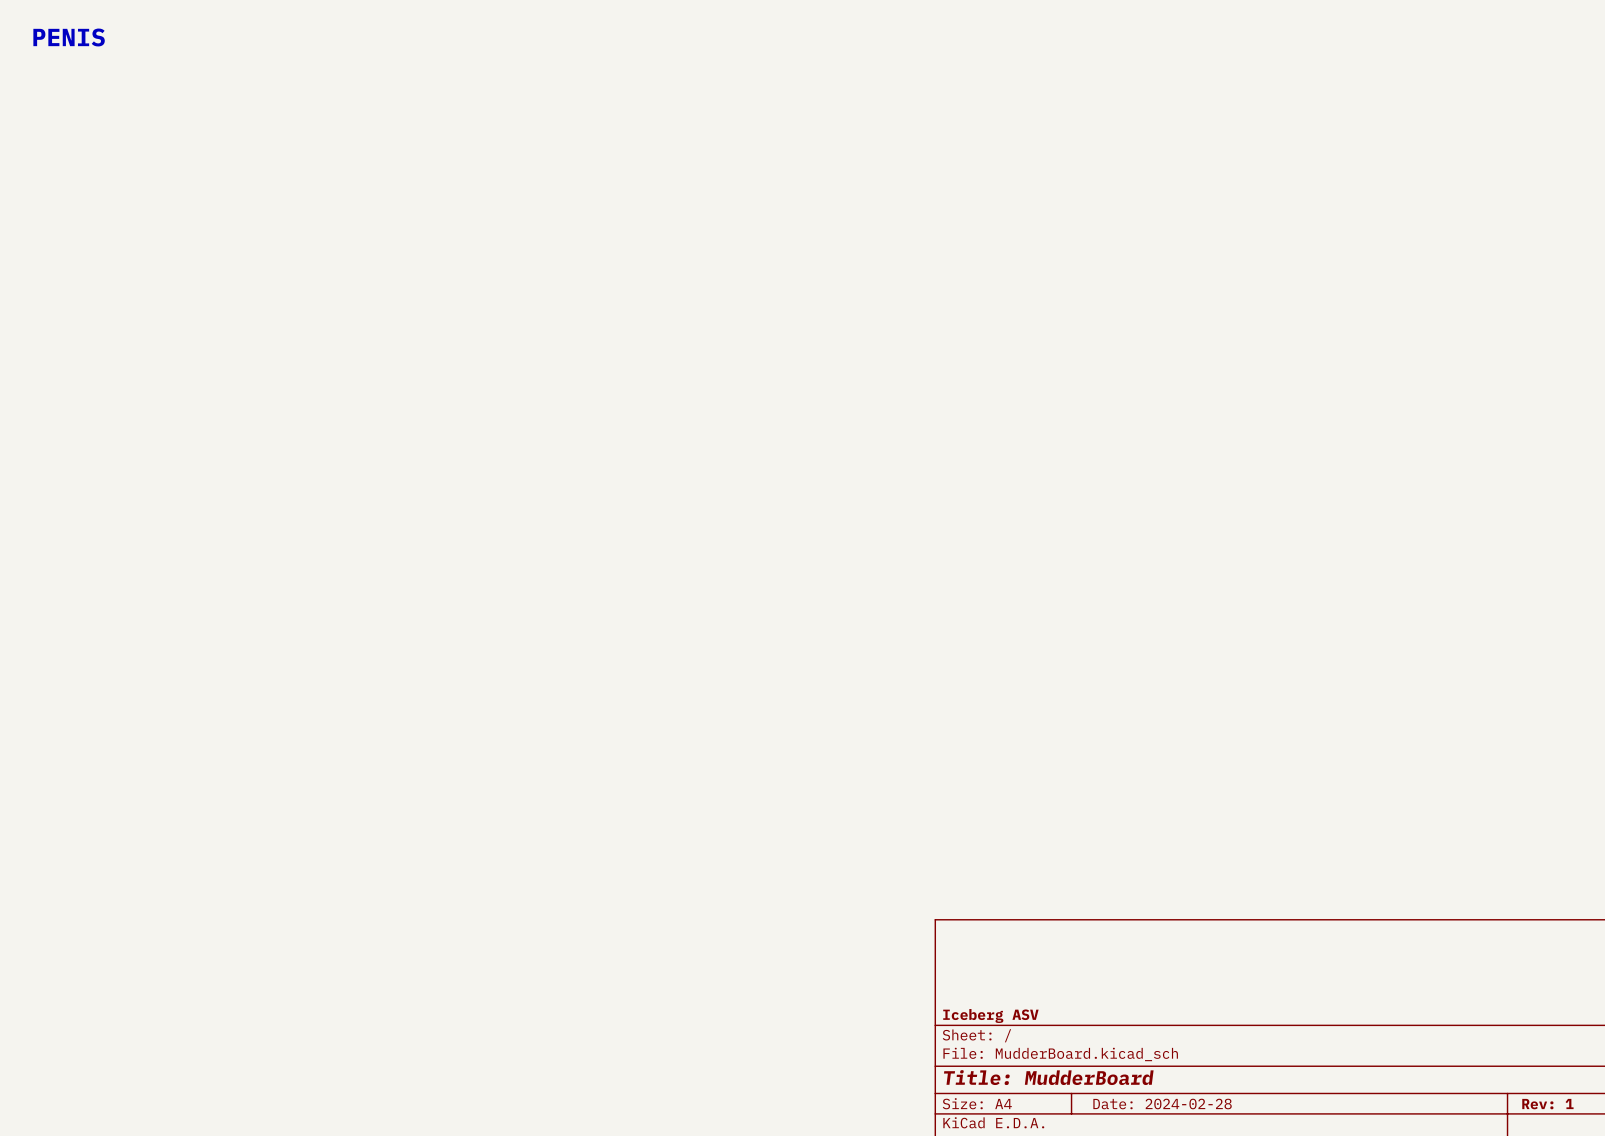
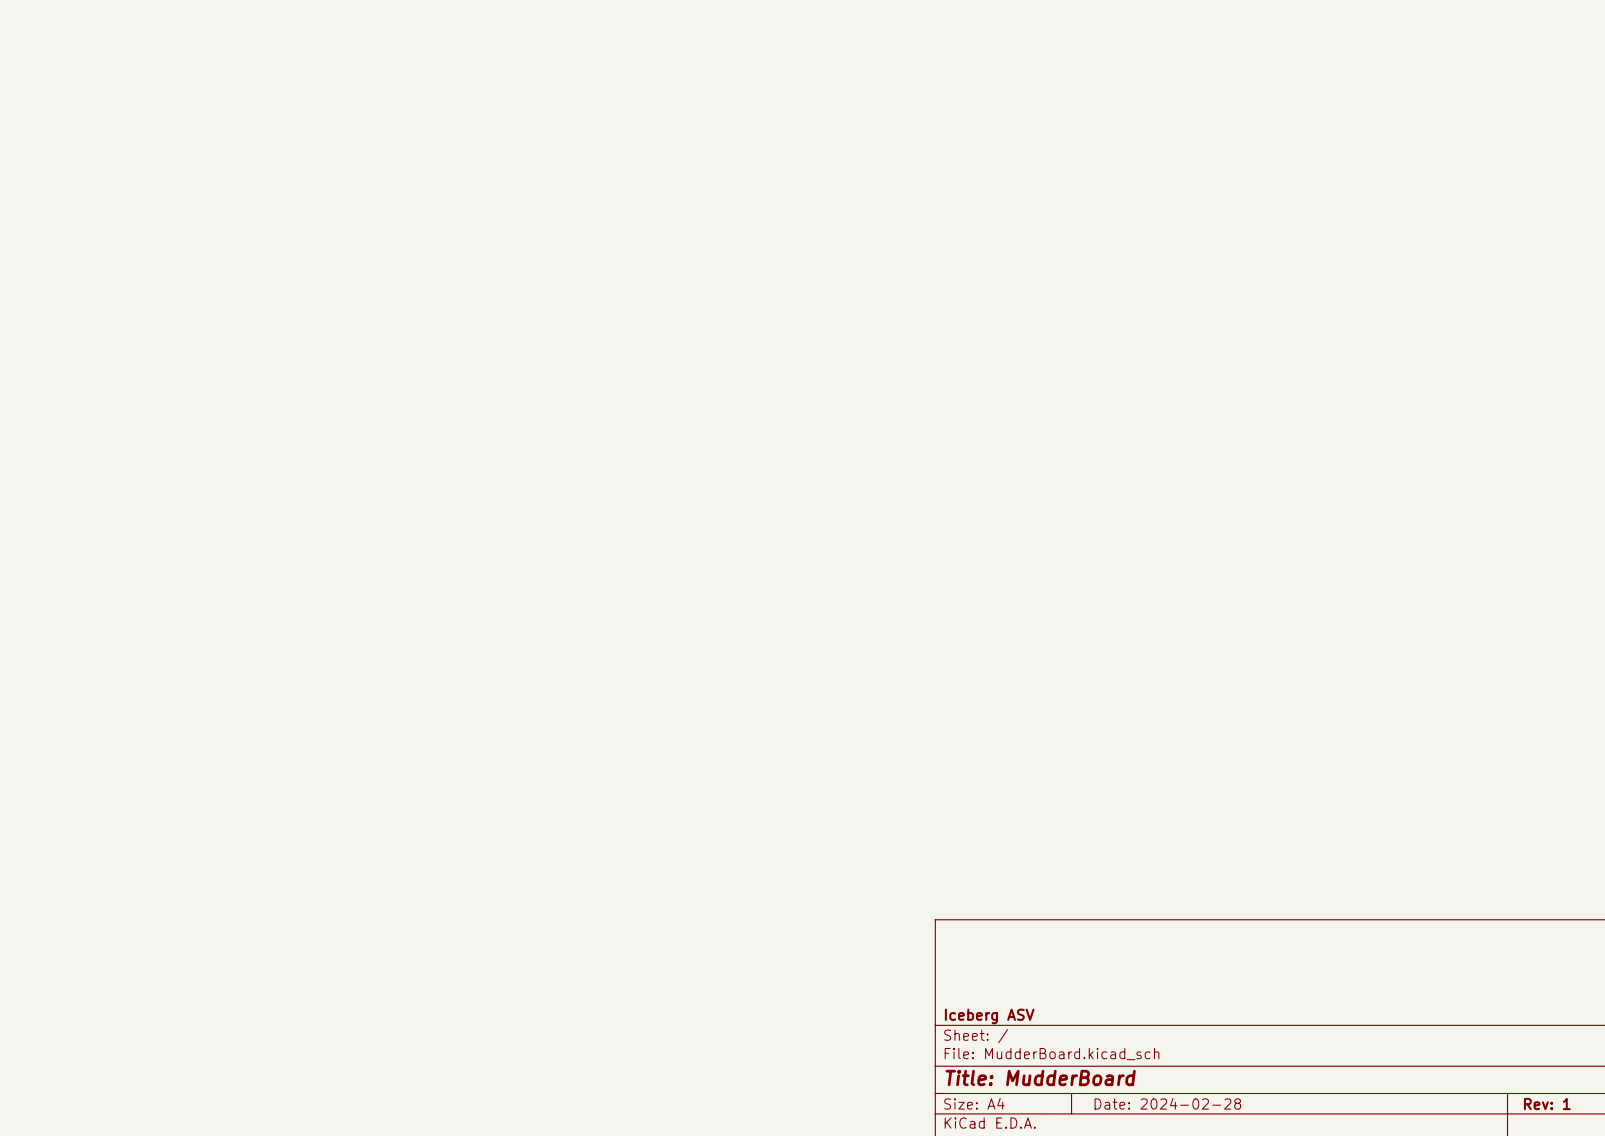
text: PENIS (69, 37) -> none

